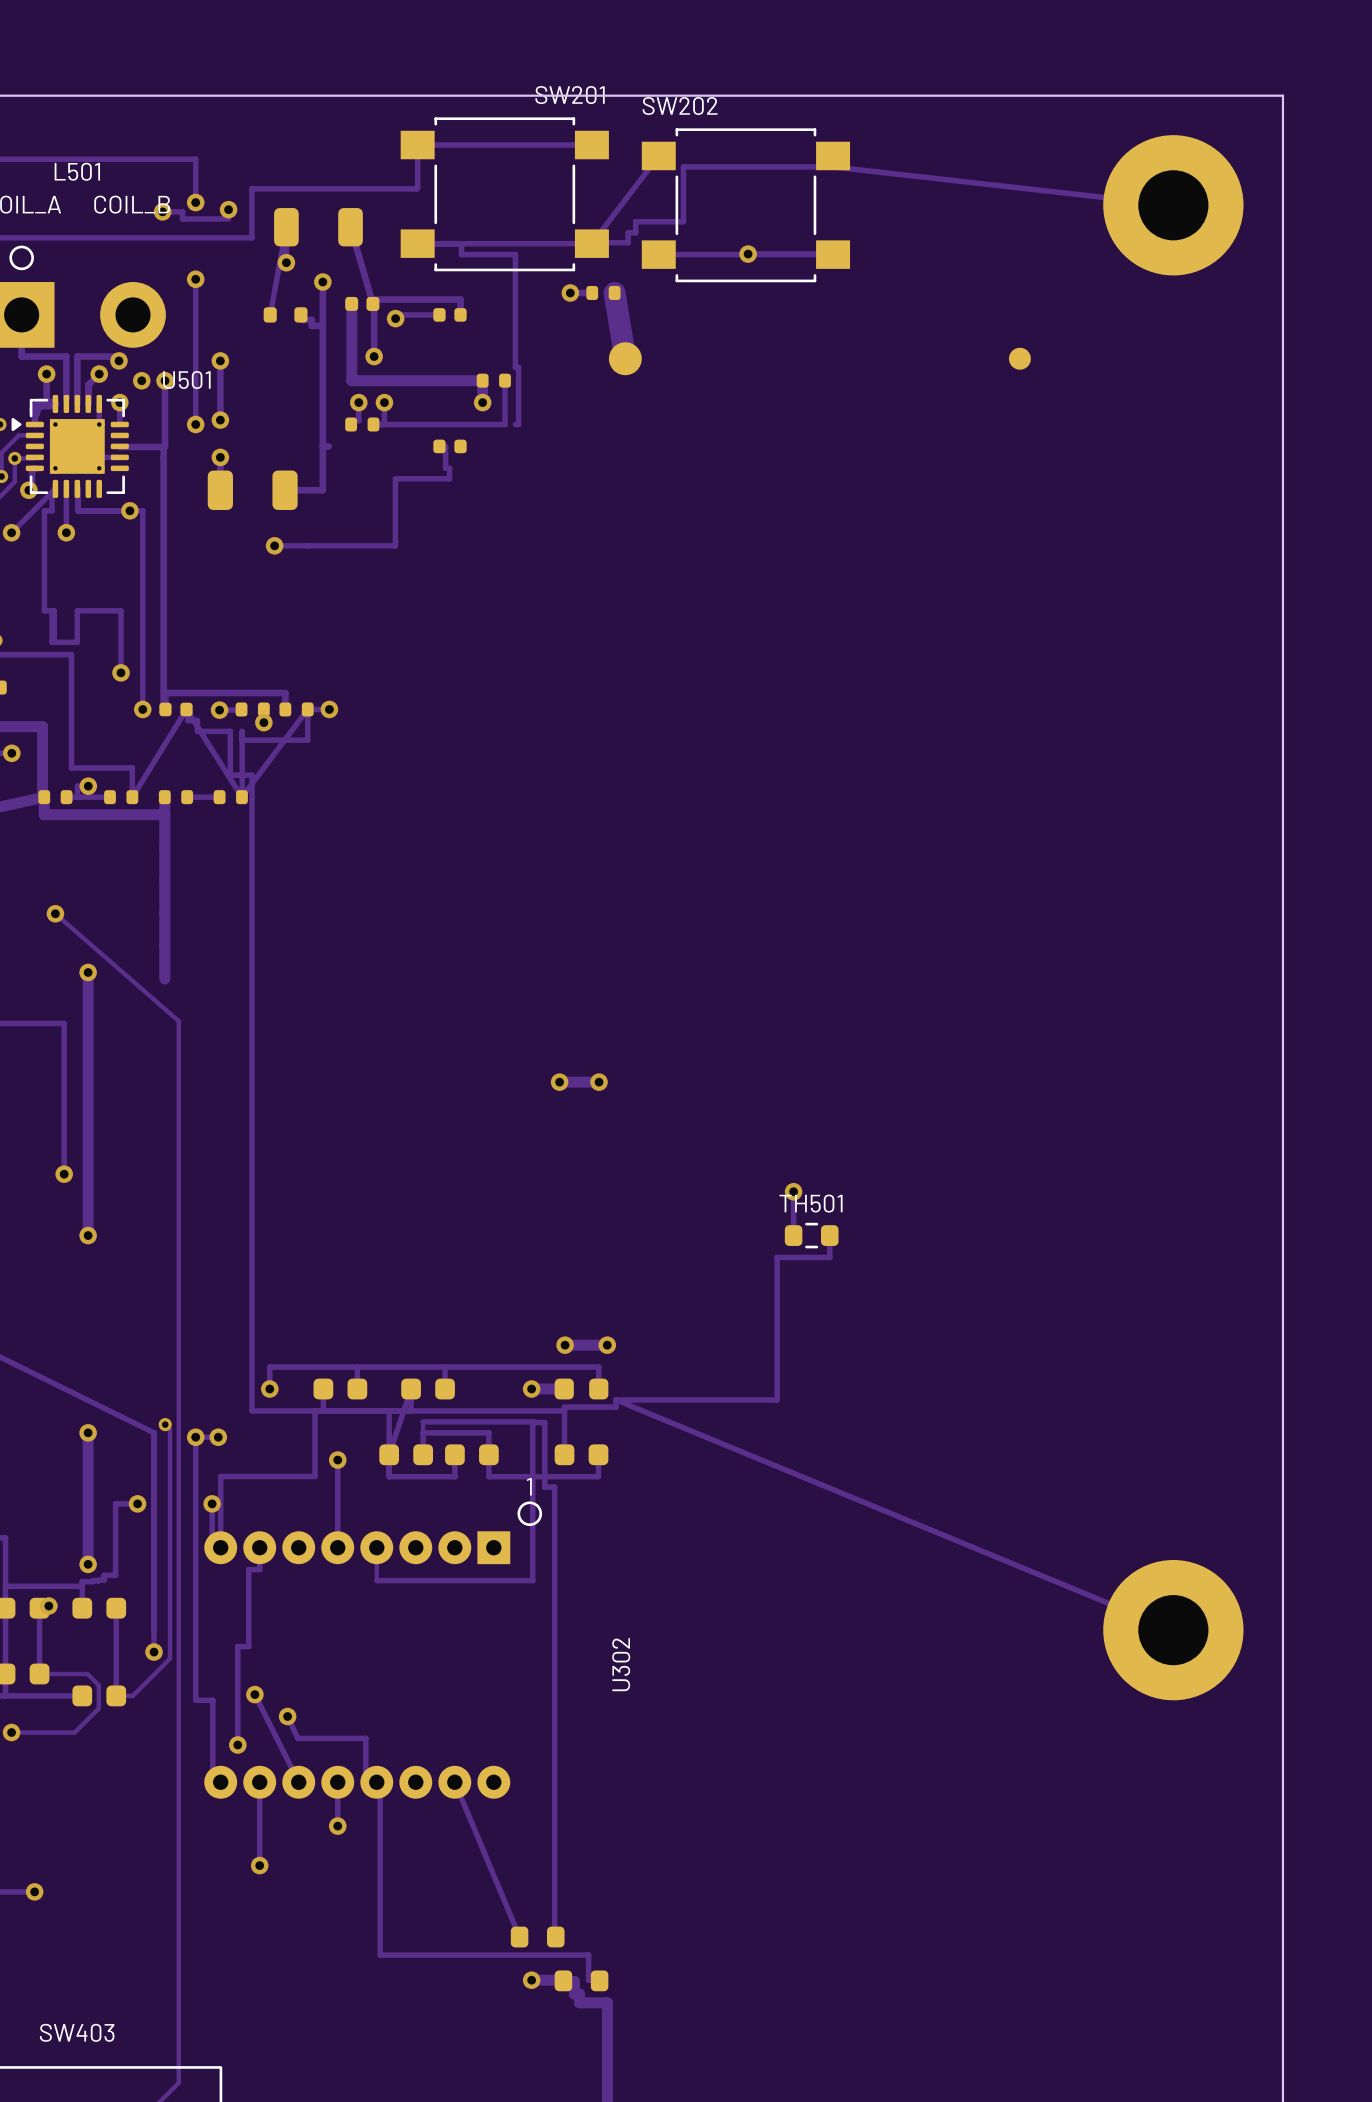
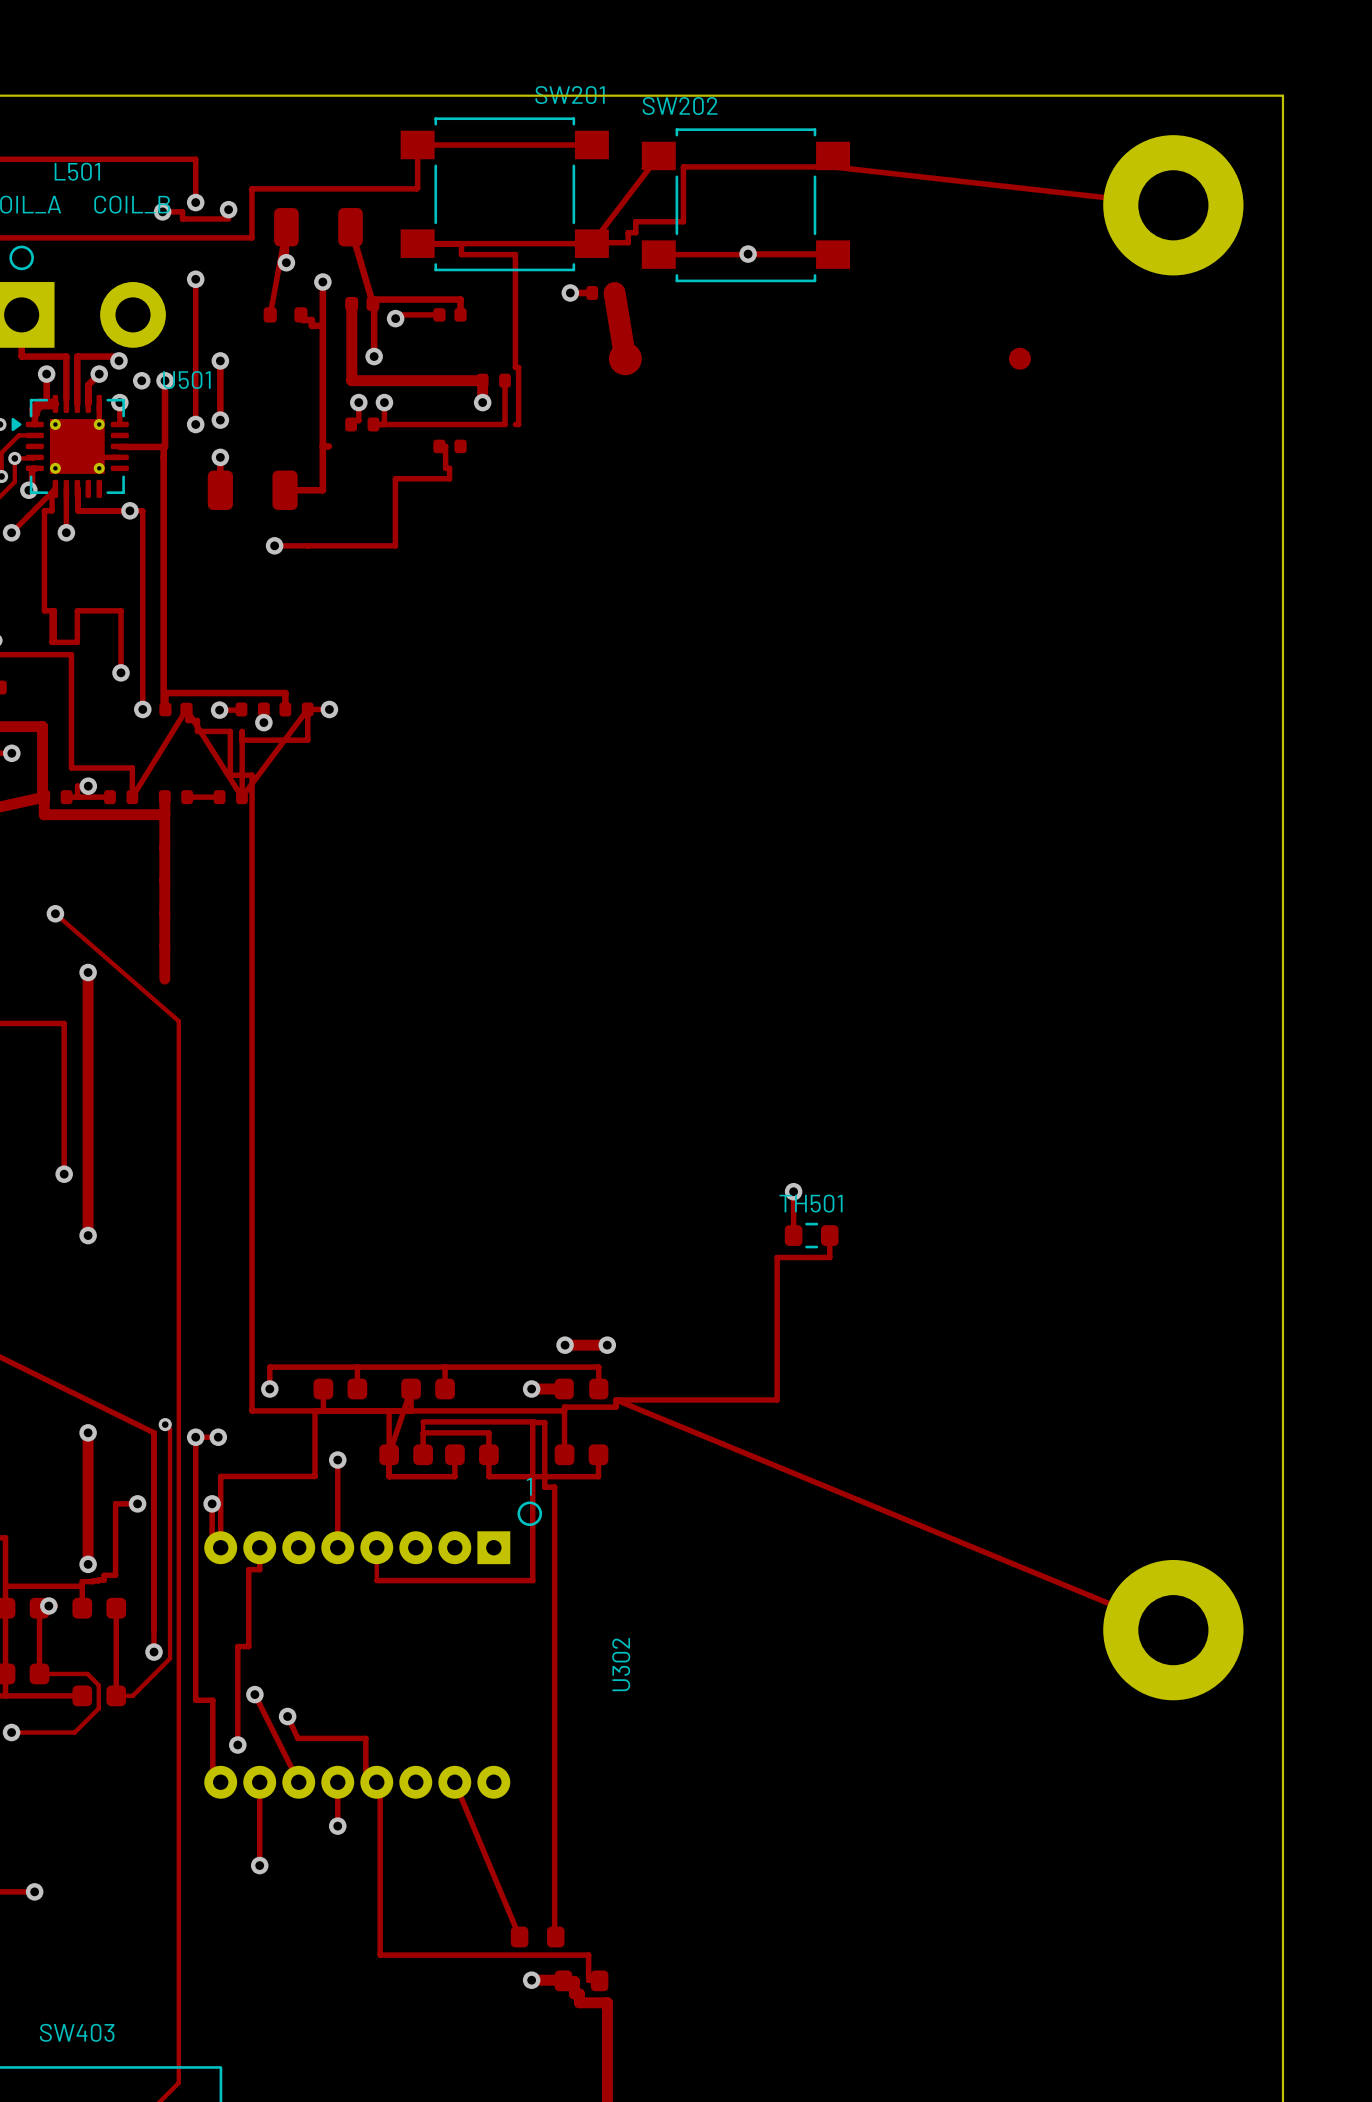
track: (559, 1082) (599, 1082) -> none
via: (559, 1082) -> none
via: (599, 1082) -> none

